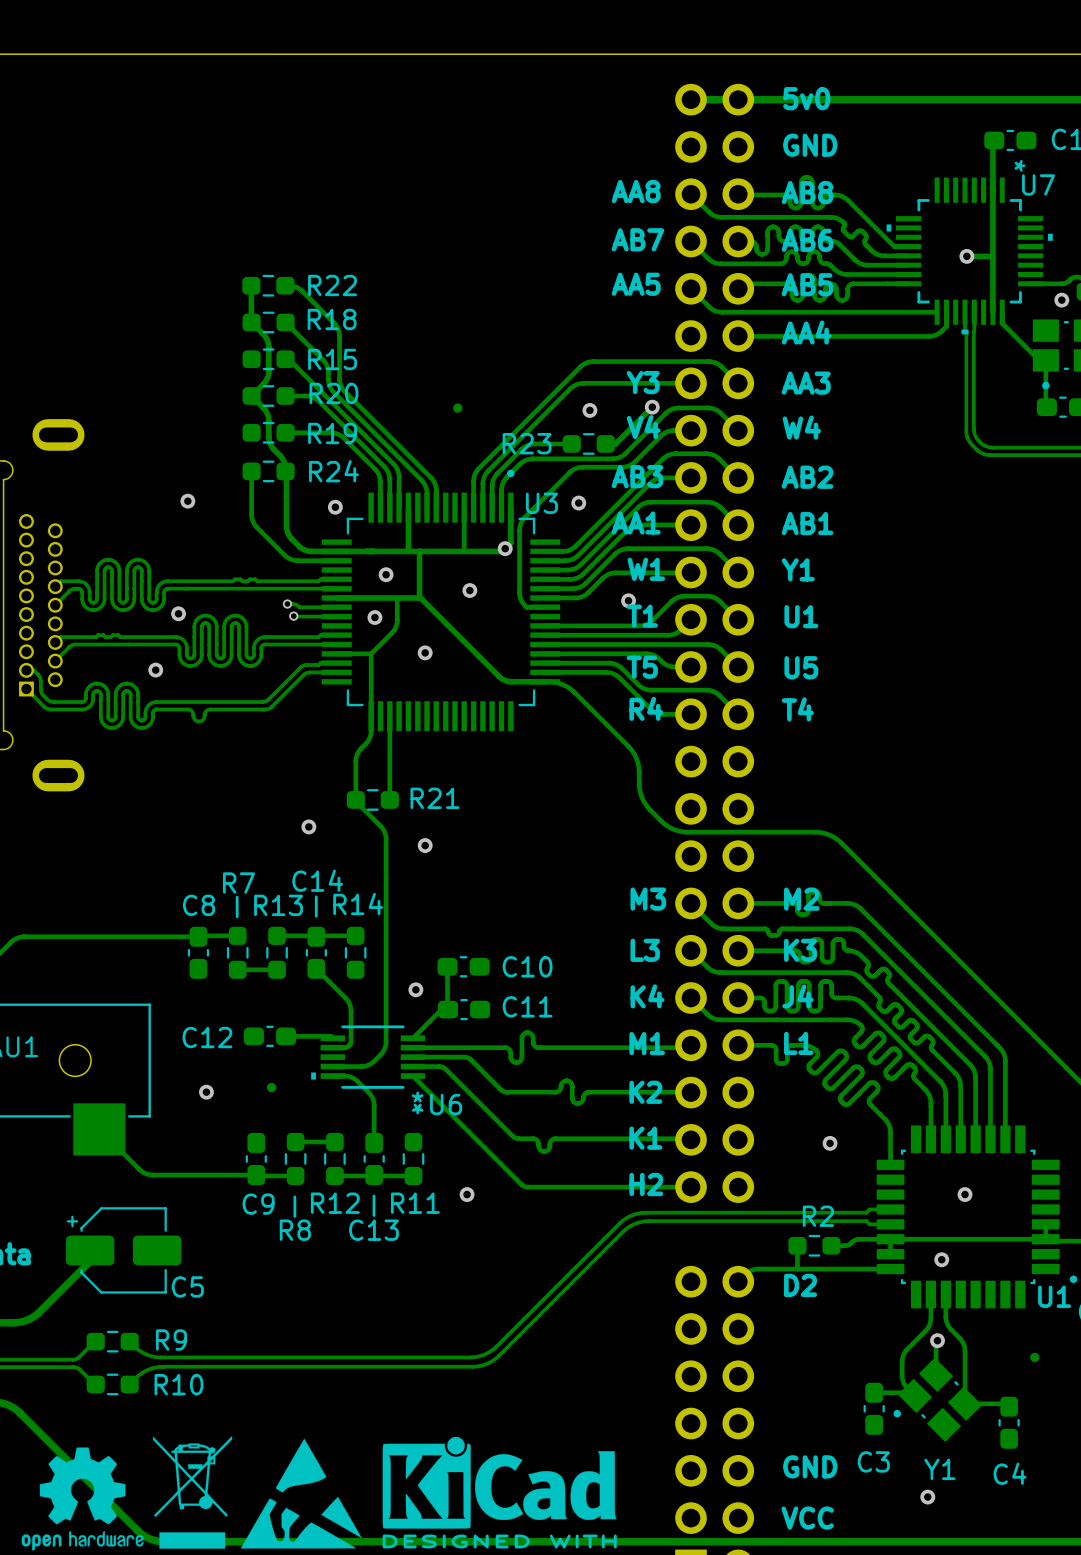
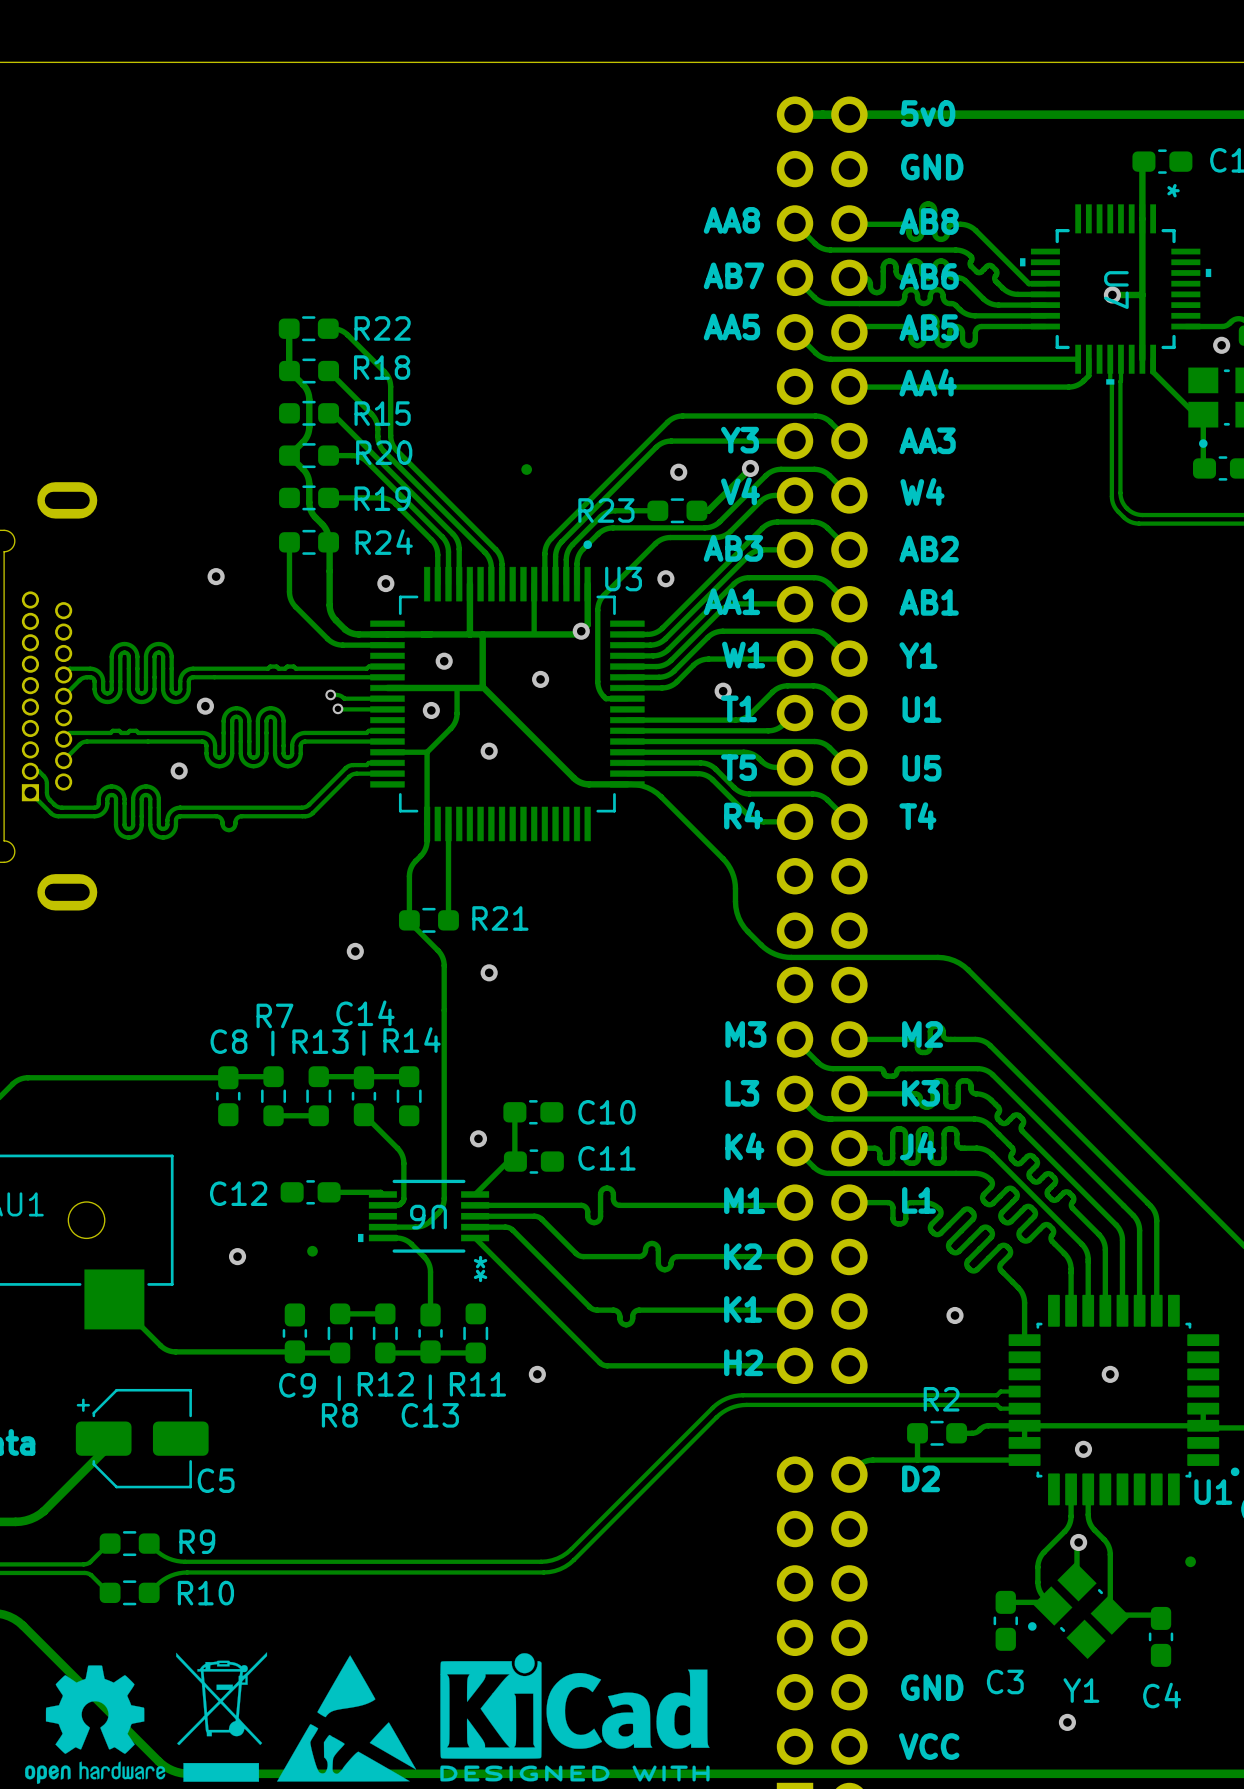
U7 name rotation: 0° (1038, 184) -> 90° clockwise (1116, 290)
U7 name position: U7 (1038, 184) -> U7 (1116, 290)
U6 name rotation: 0° (446, 1104) -> 180° (428, 1217)
U6 name position: U6 (446, 1104) -> U6 (428, 1217)

